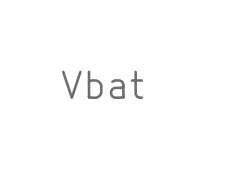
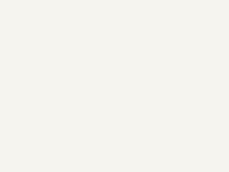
label: Vbat (102, 84) -> none

